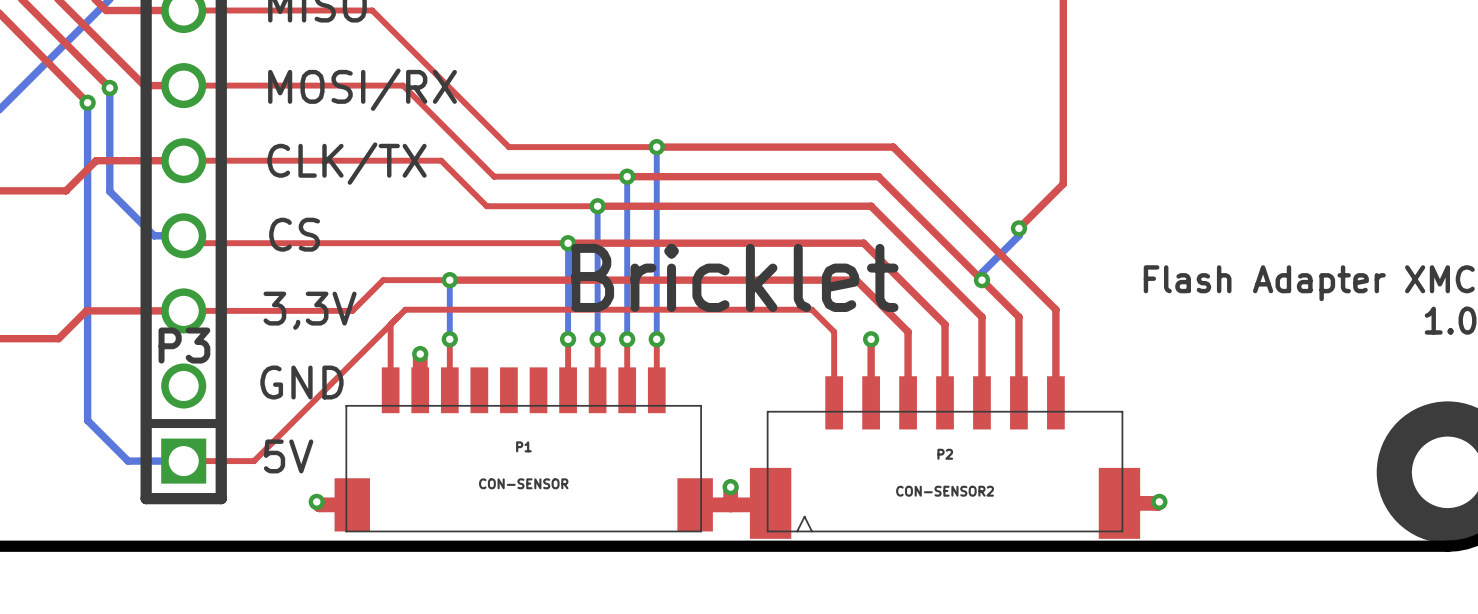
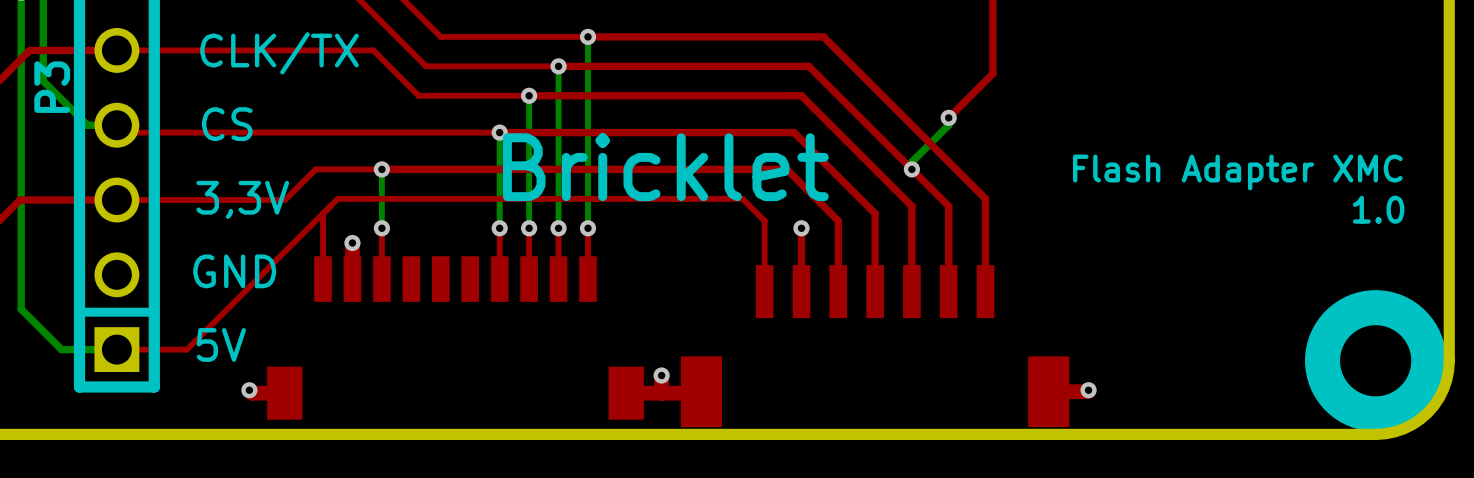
P3 name rotation: 0° (184, 345) -> 90° counterclockwise (52, 87)
P3 name position: P3 (184, 345) -> P3 (52, 87)
P1: CON-SENSOR (523, 449) -> none
part: none -> (455, 337)
P2: CON-SENSOR2 (945, 457) -> none
part: none -> (875, 346)

